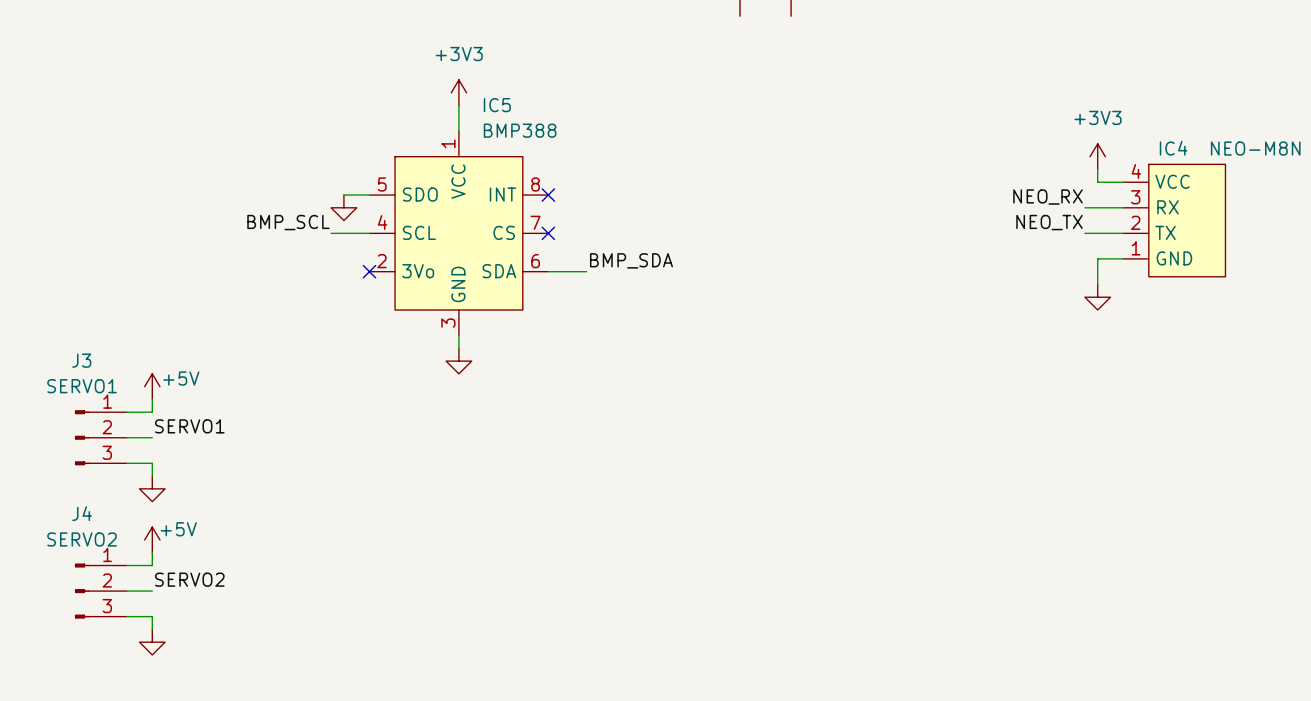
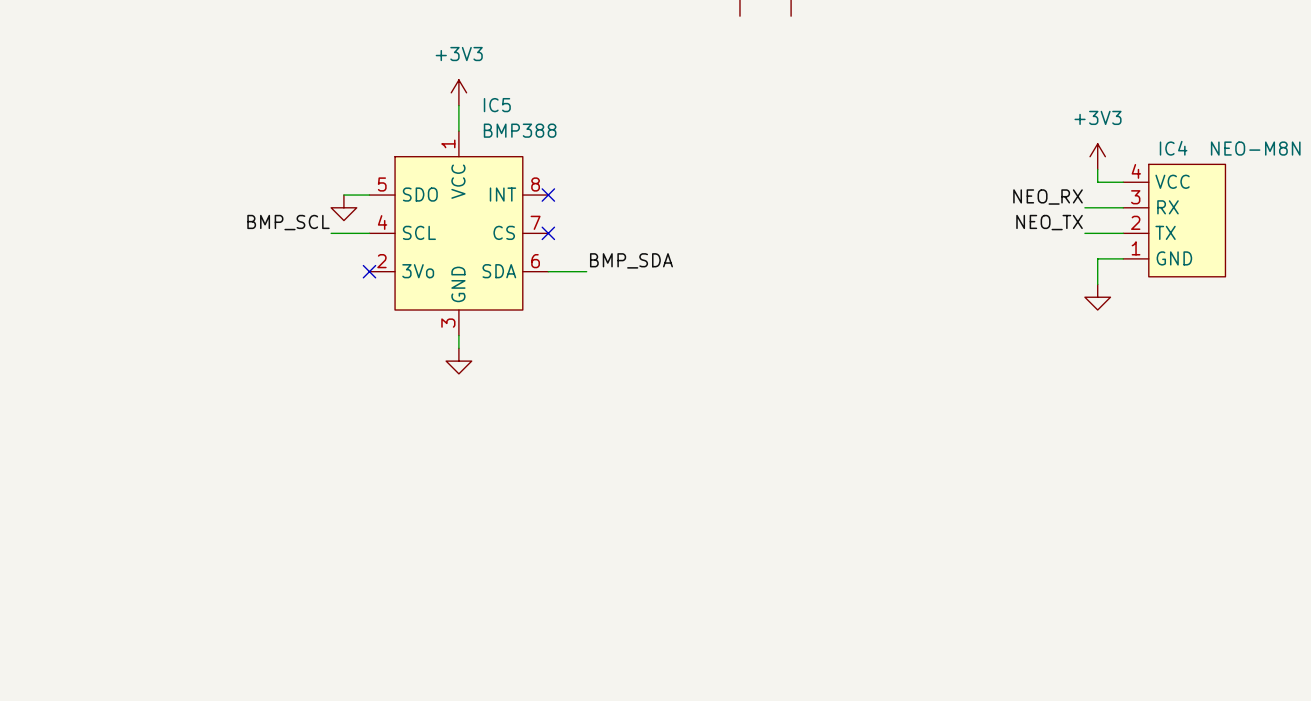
power symbol: +5V (152, 386) -> none
wire: (152, 399) (152, 412) (126, 412) -> none
label: SERVO1 (189, 426) -> none
J3: SERVO1 (100, 437) -> none
wire: (126, 437) (152, 437) -> none
wire: (126, 463) (152, 463) (152, 476) -> none
power symbol: (152, 488) -> none
power symbol: +5V (152, 539) -> none
wire: (152, 552) (152, 565) (126, 565) -> none
label: SERVO2 (189, 579) -> none
J4: SERVO2 (100, 591) -> none
wire: (126, 591) (152, 591) -> none
wire: (126, 616) (152, 616) (152, 629) -> none
power symbol: (152, 642) -> none

